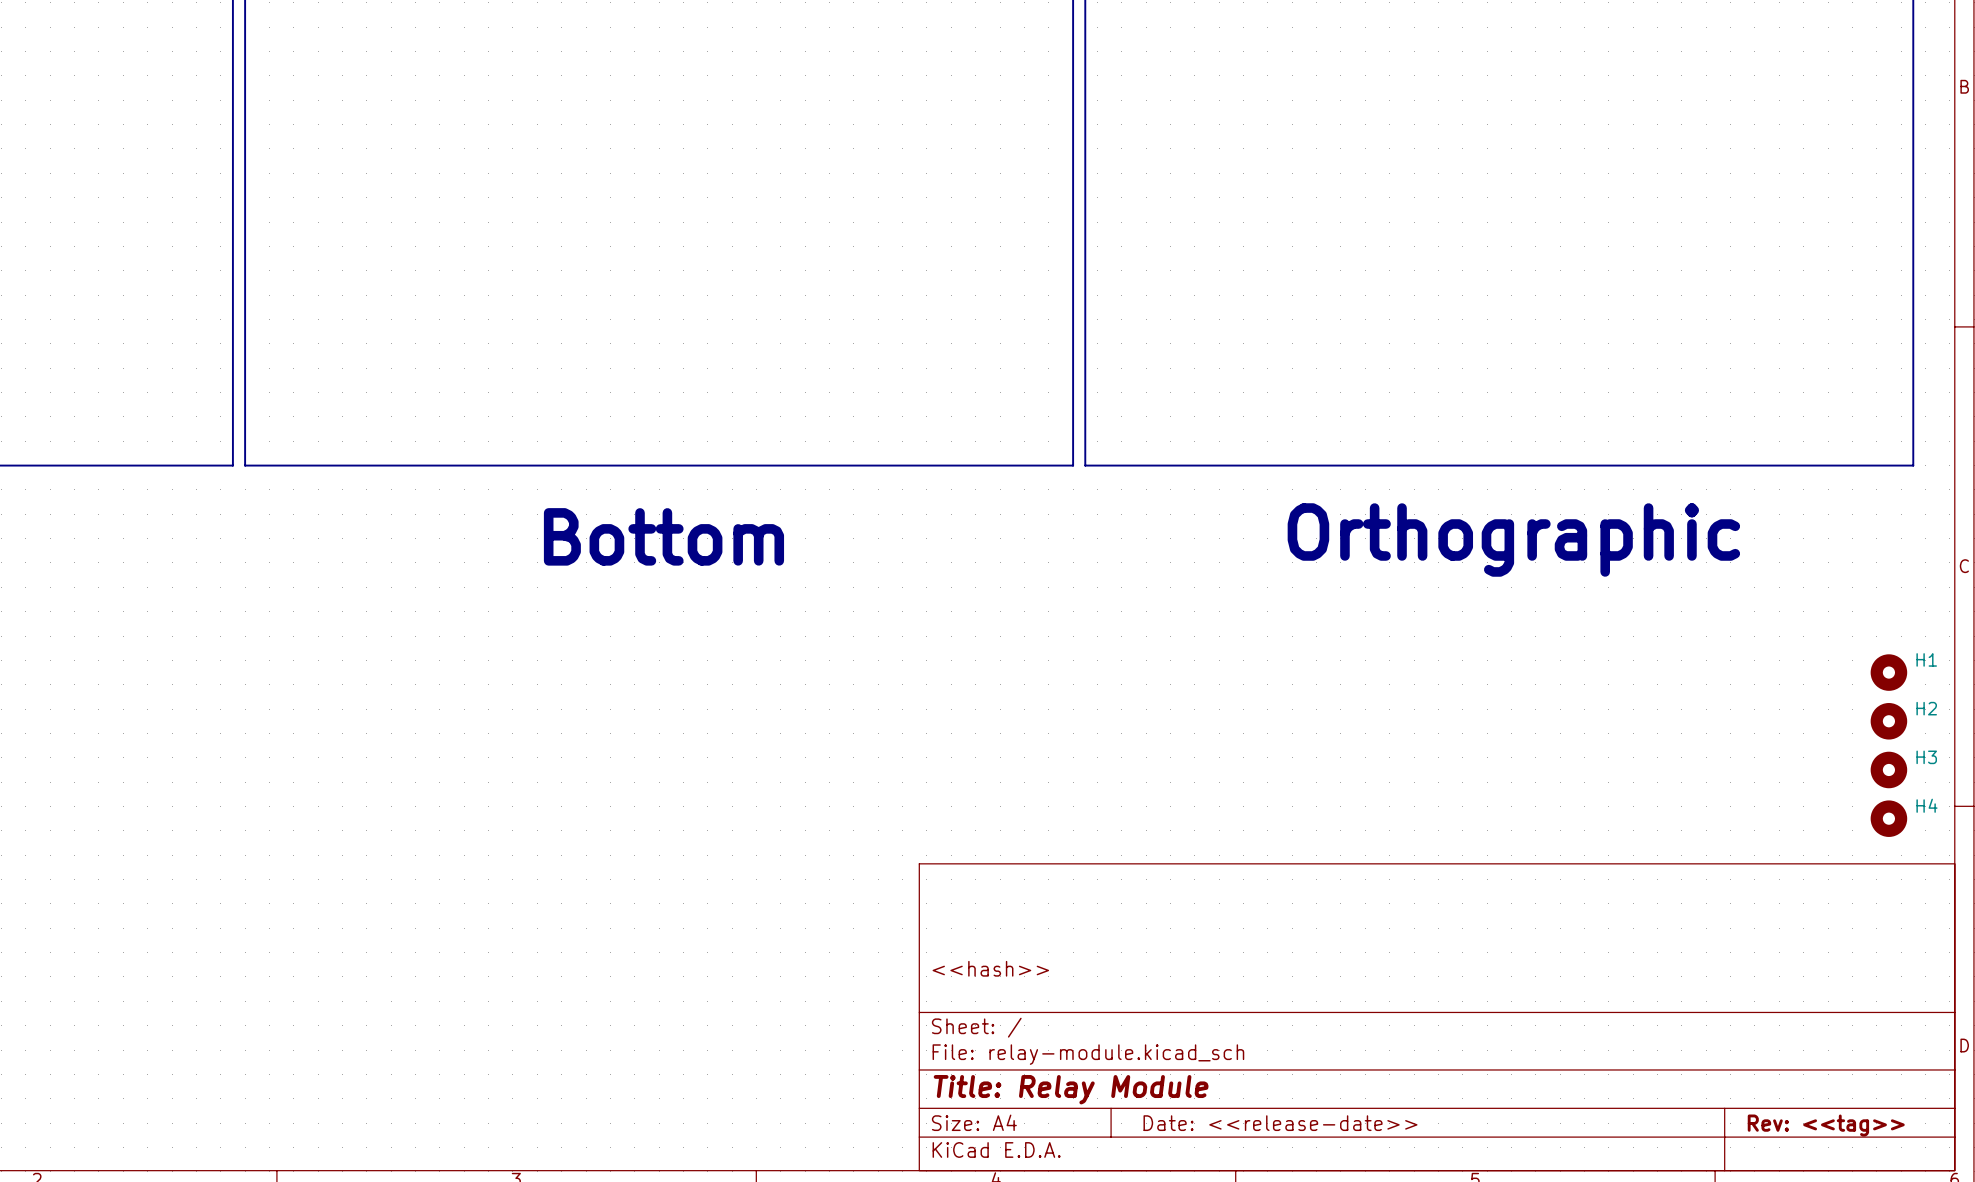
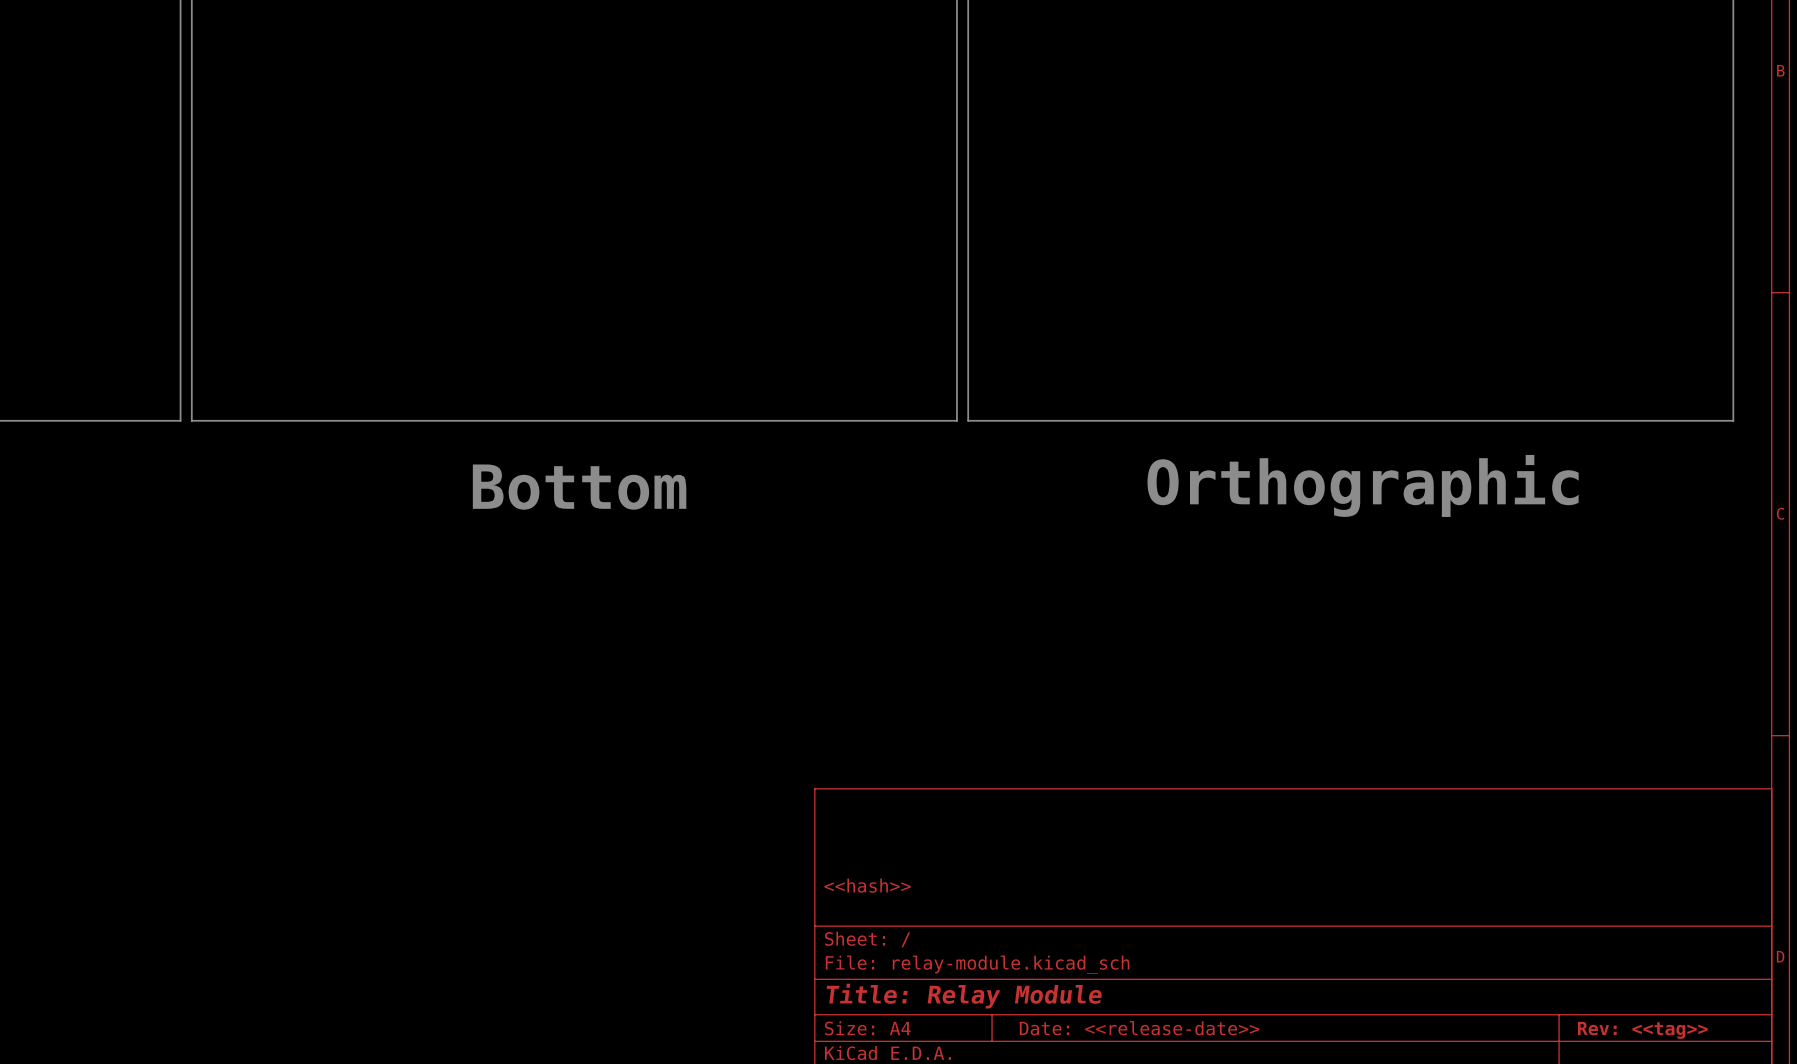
H1: (1888, 672) -> none
H2: (1888, 721) -> none
H3: (1888, 769) -> none
H4: (1888, 818) -> none

